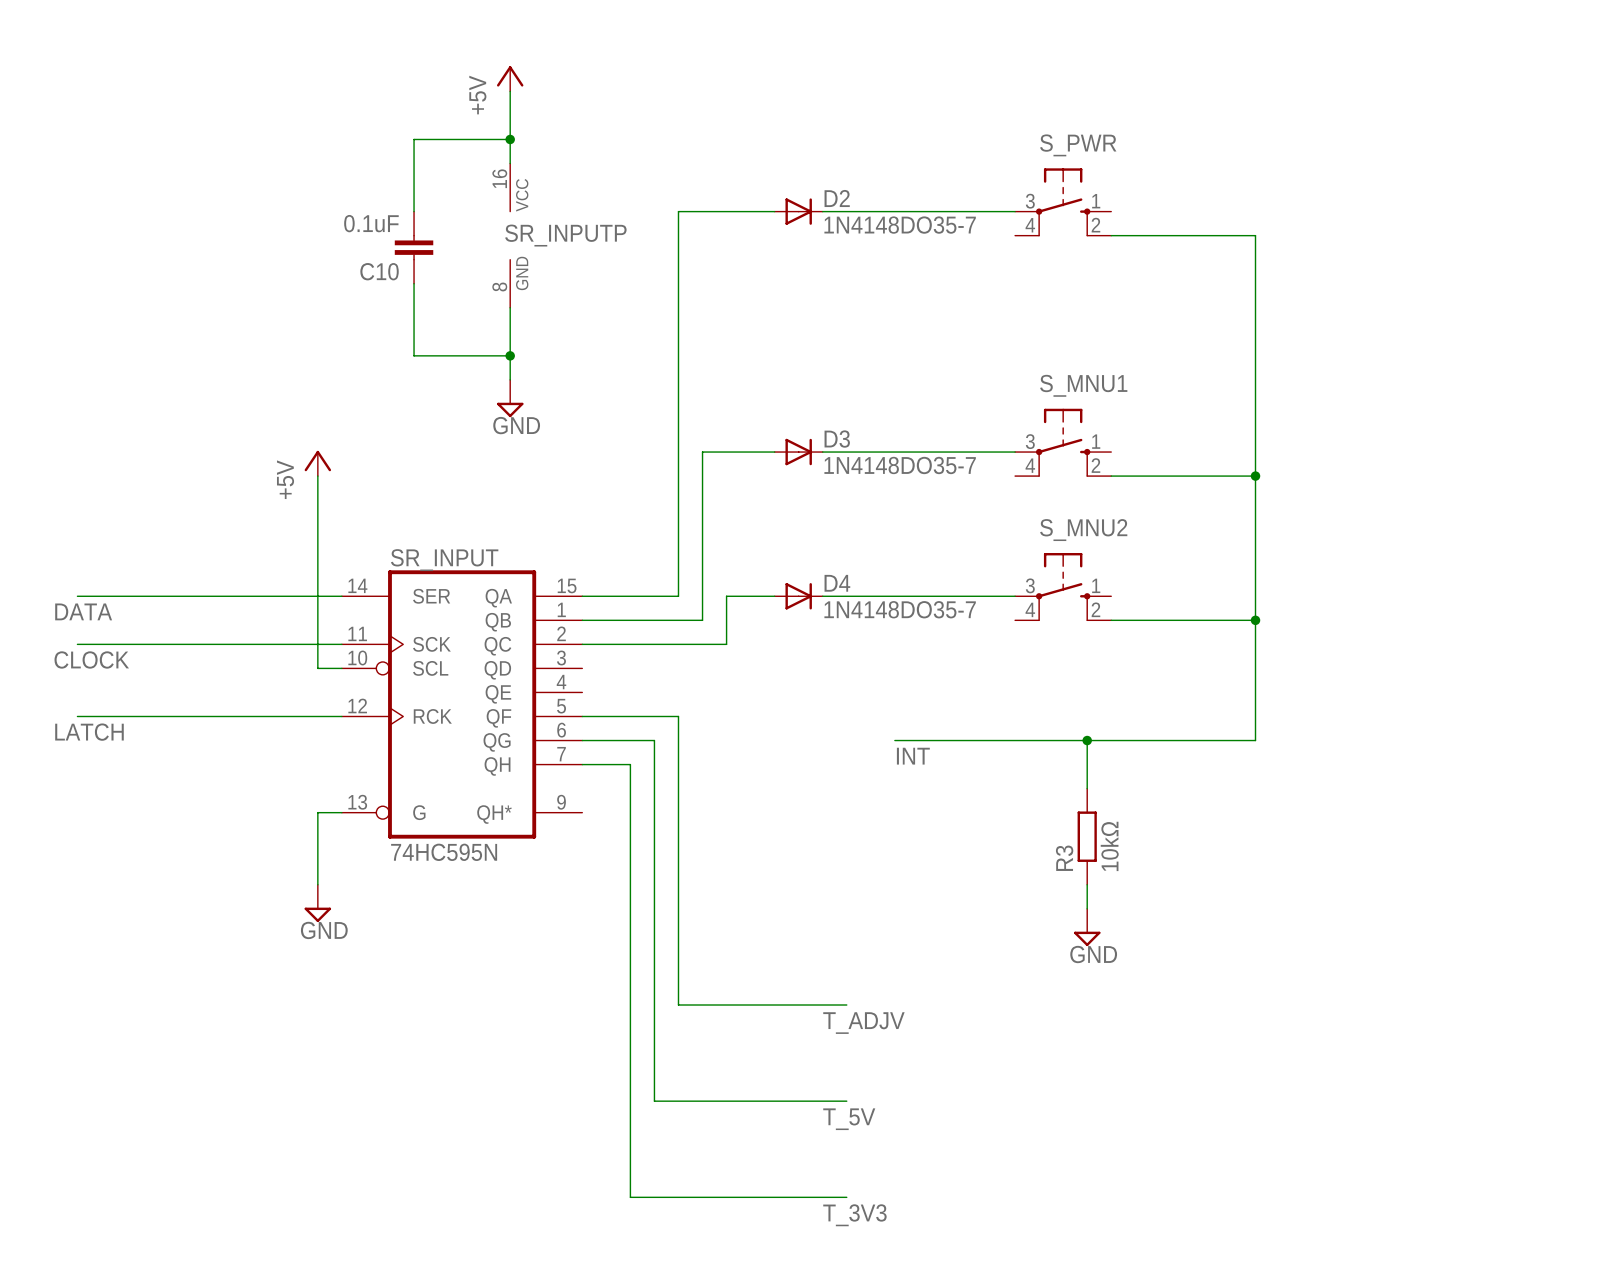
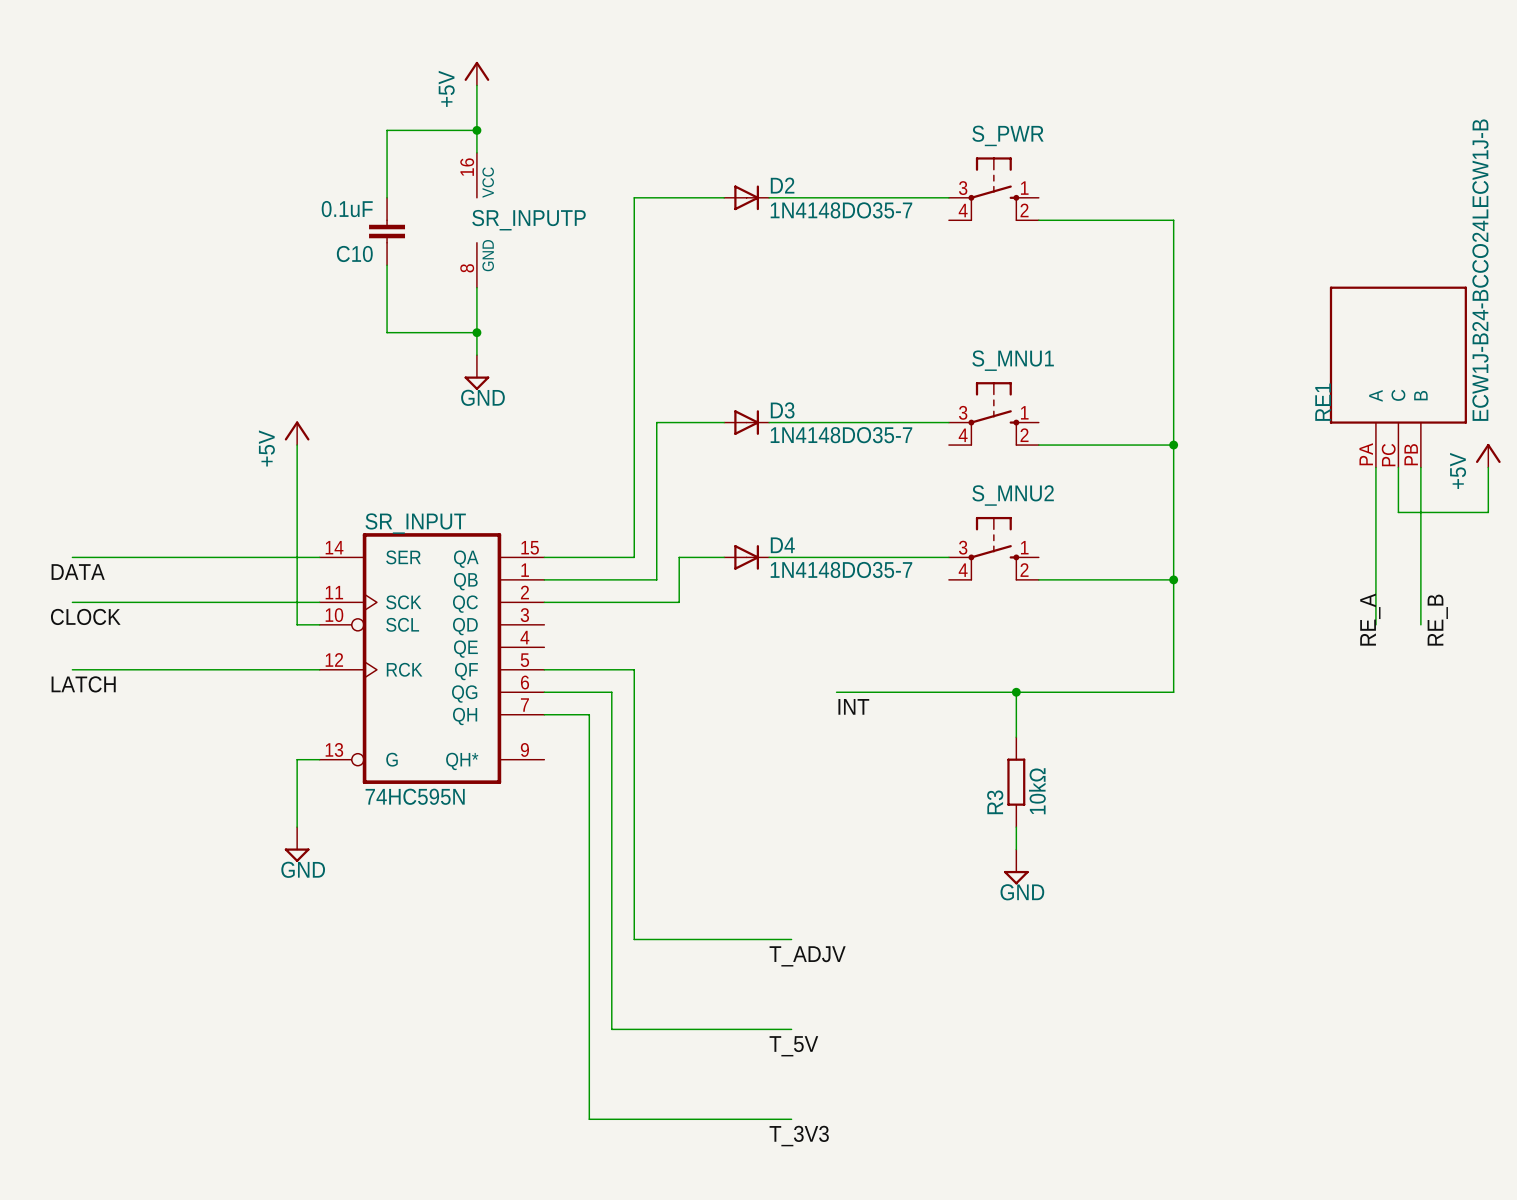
RE1: none -> ECW1J-B24-BCCO24LECW1J-B (1398, 377)
power symbol: none -> +5V (1488, 455)
wire: none -> (1375, 467) (1375, 624)
wire: none -> (1398, 467) (1398, 512) (1488, 512) (1488, 467)
wire: none -> (1420, 467) (1420, 624)
label: none -> RE_A (1370, 619)
label: none -> RE_B (1437, 620)

